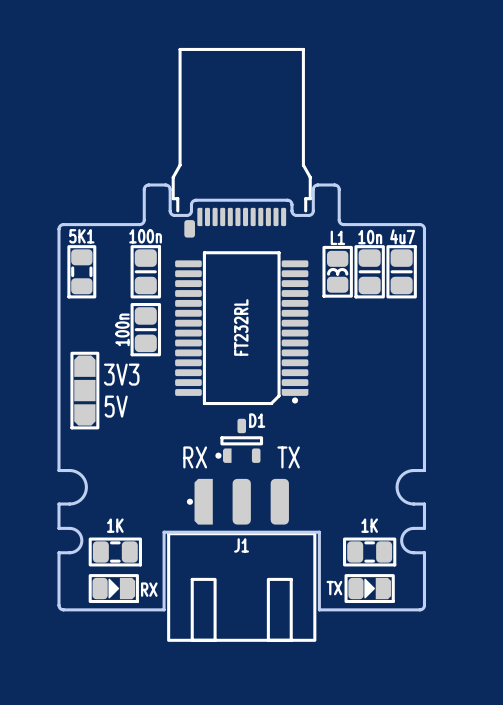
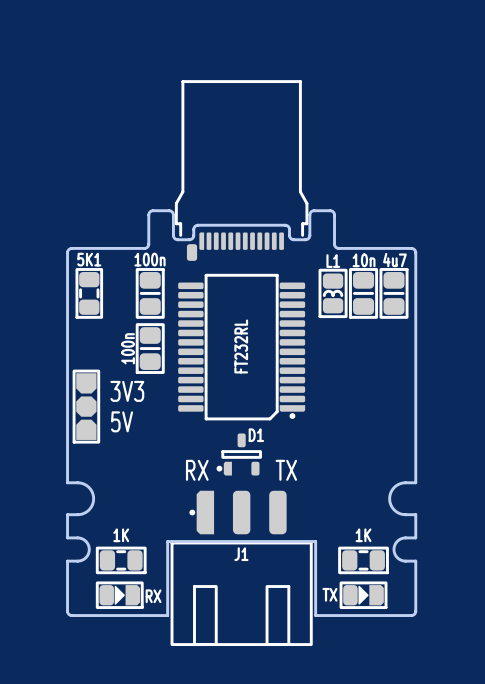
part footprint: [70, 351, 100, 430] -> [72, 369, 101, 444]

